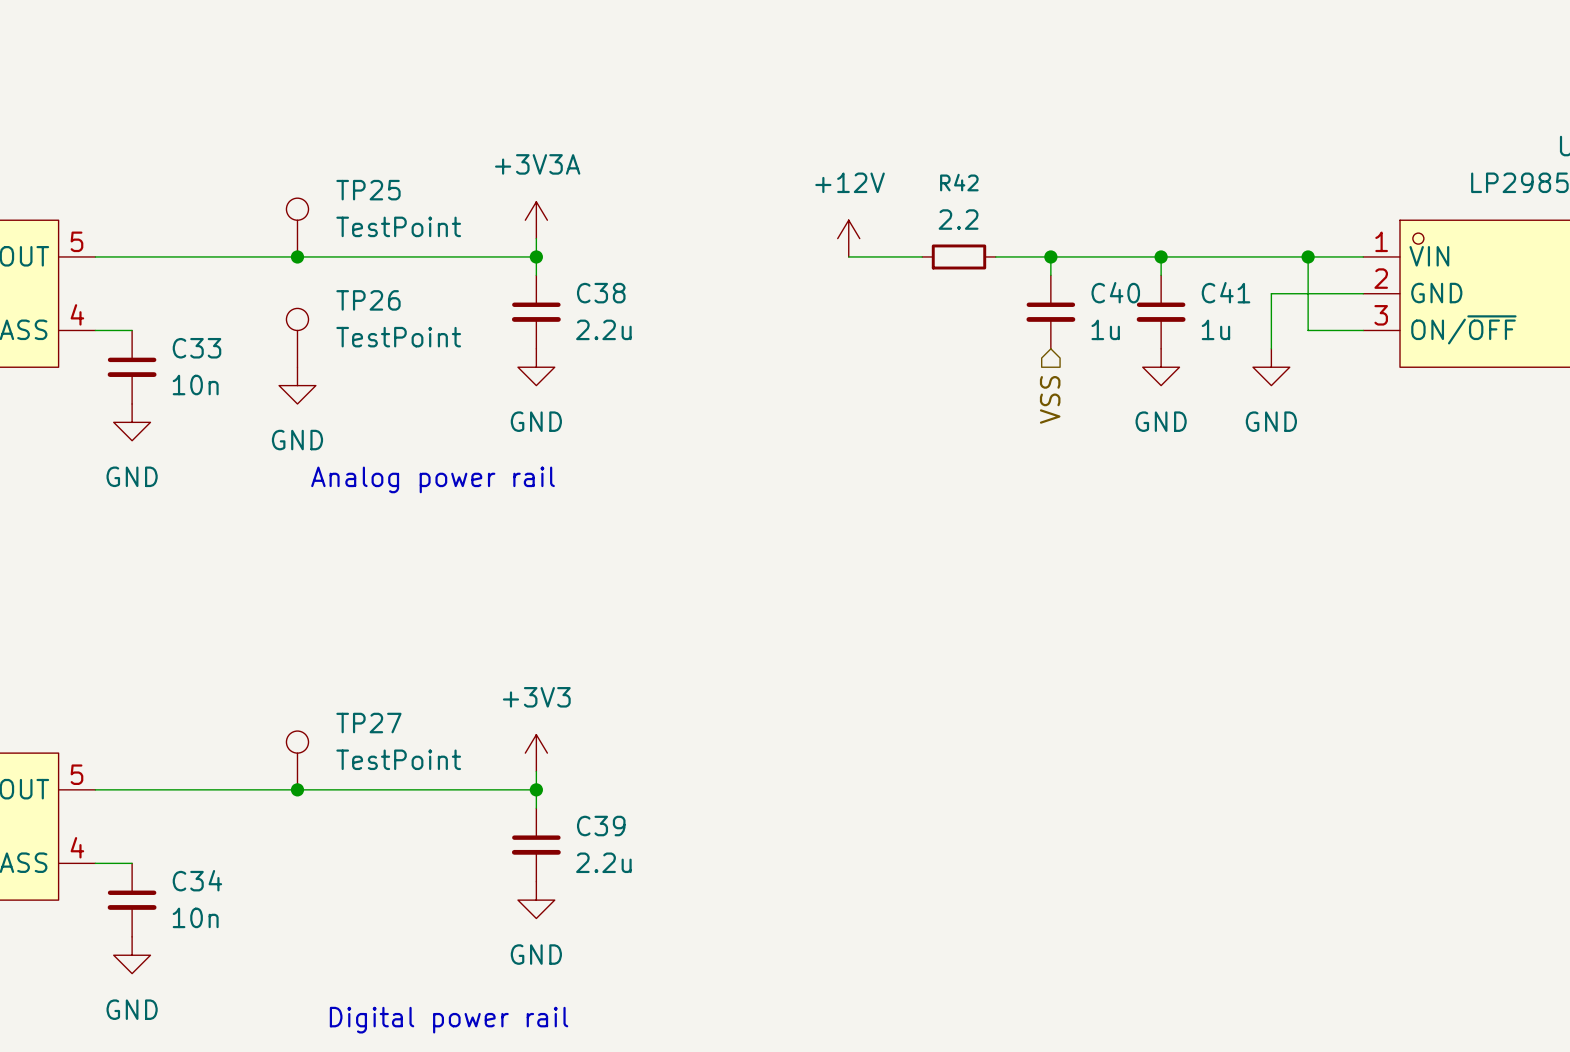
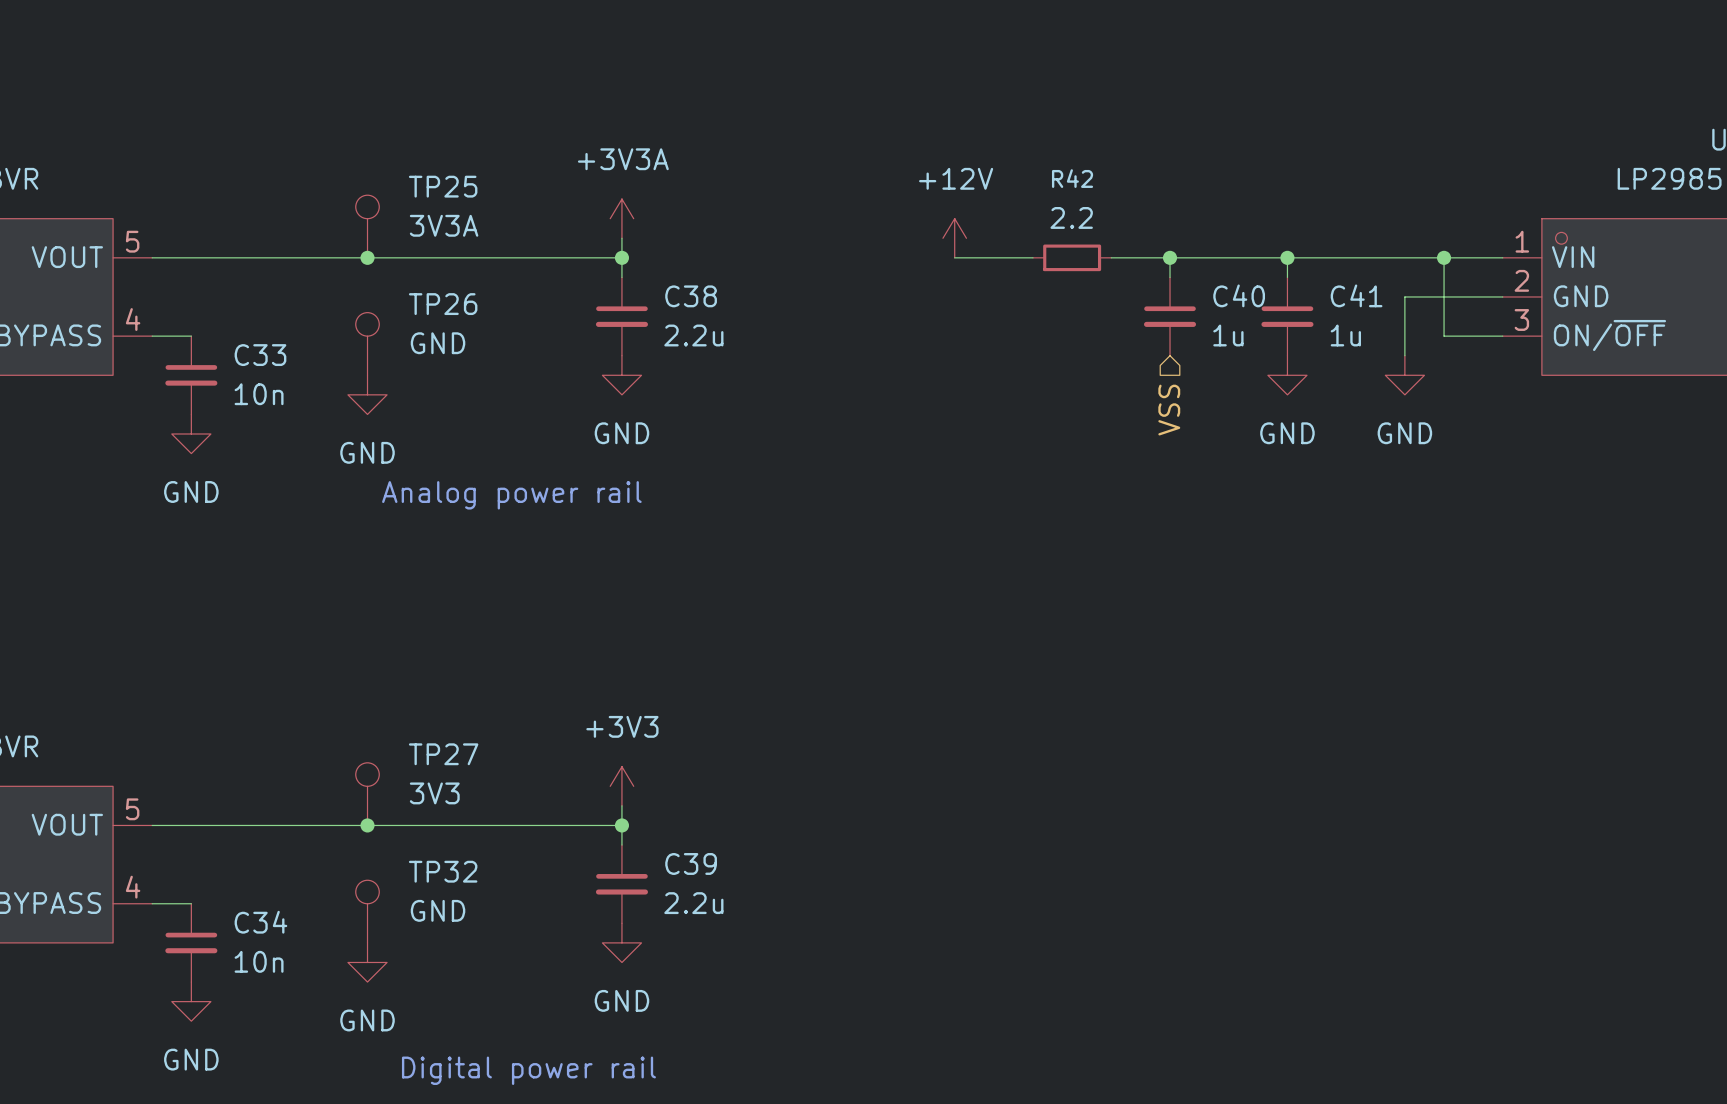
TP25 value: TestPoint (398, 226) -> 3V3A (444, 225)
TP26 value: TestPoint (398, 337) -> GND (438, 343)
TP27 value: TestPoint (398, 759) -> 3V3 (434, 793)
TP32: none -> GND (367, 911)
power symbol: none -> GND (367, 962)

